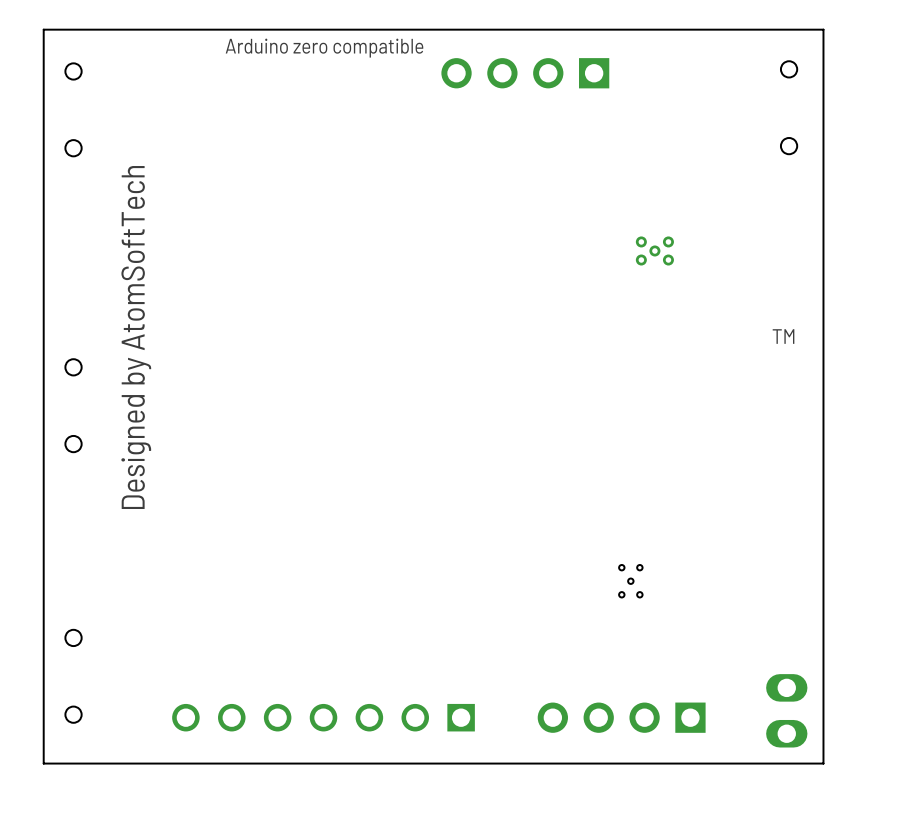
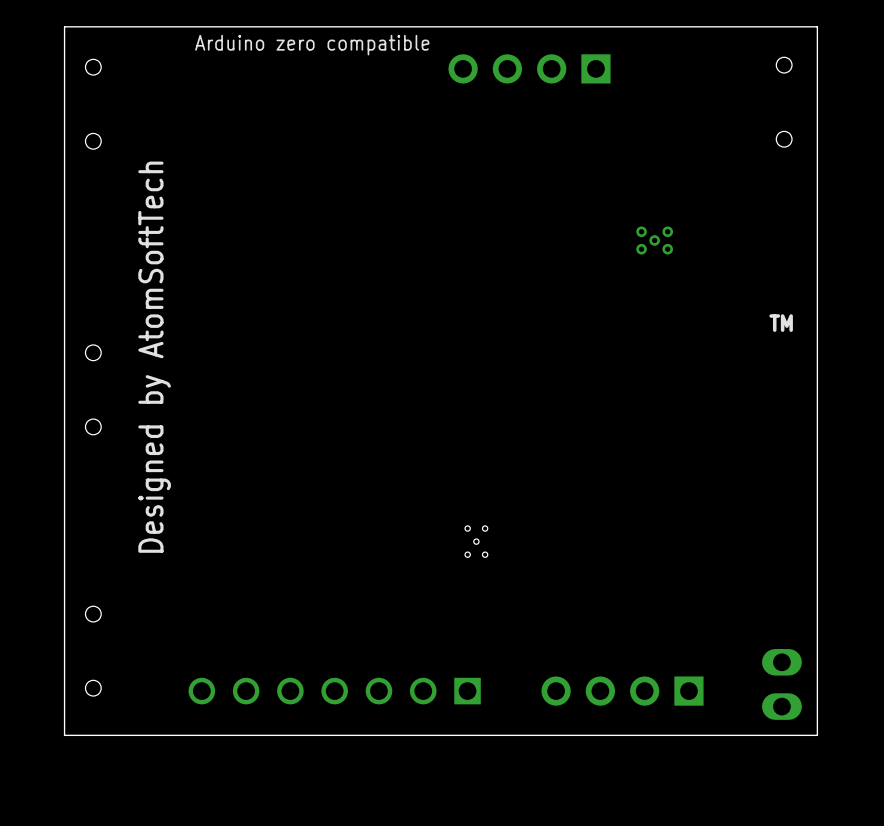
part position: (630, 581) -> (476, 541)

